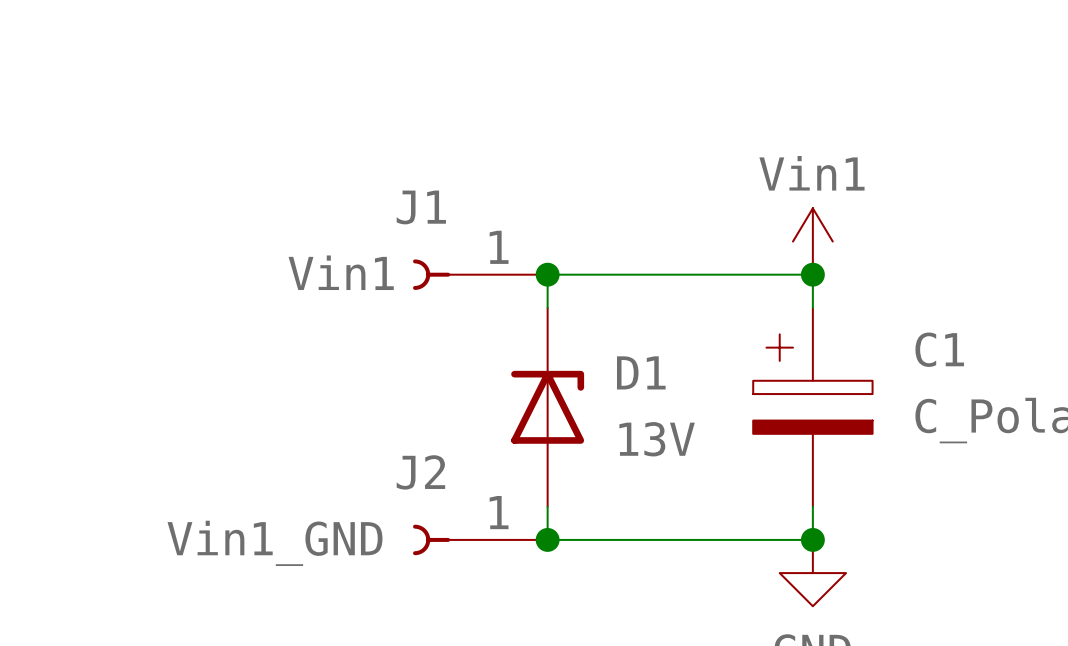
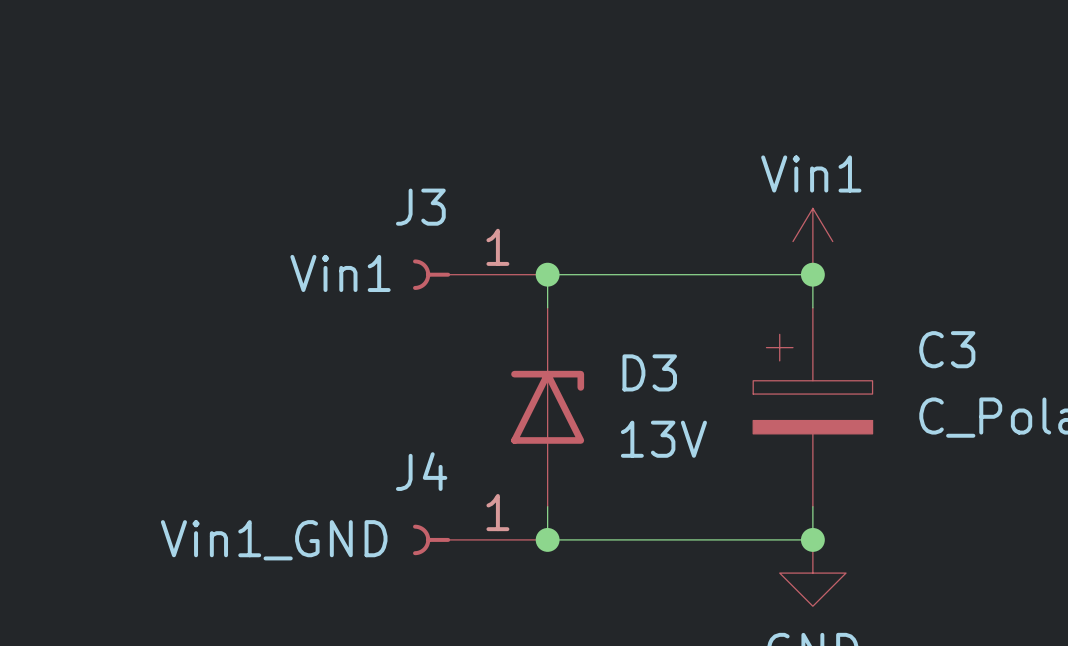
J1 name: J1 (421, 207) -> J3 (420, 207)
C1 name: C1 (939, 349) -> C3 (947, 349)
D1 name: D1 (641, 372) -> D3 (649, 372)
J2 name: J2 (420, 472) -> J4 (421, 471)

